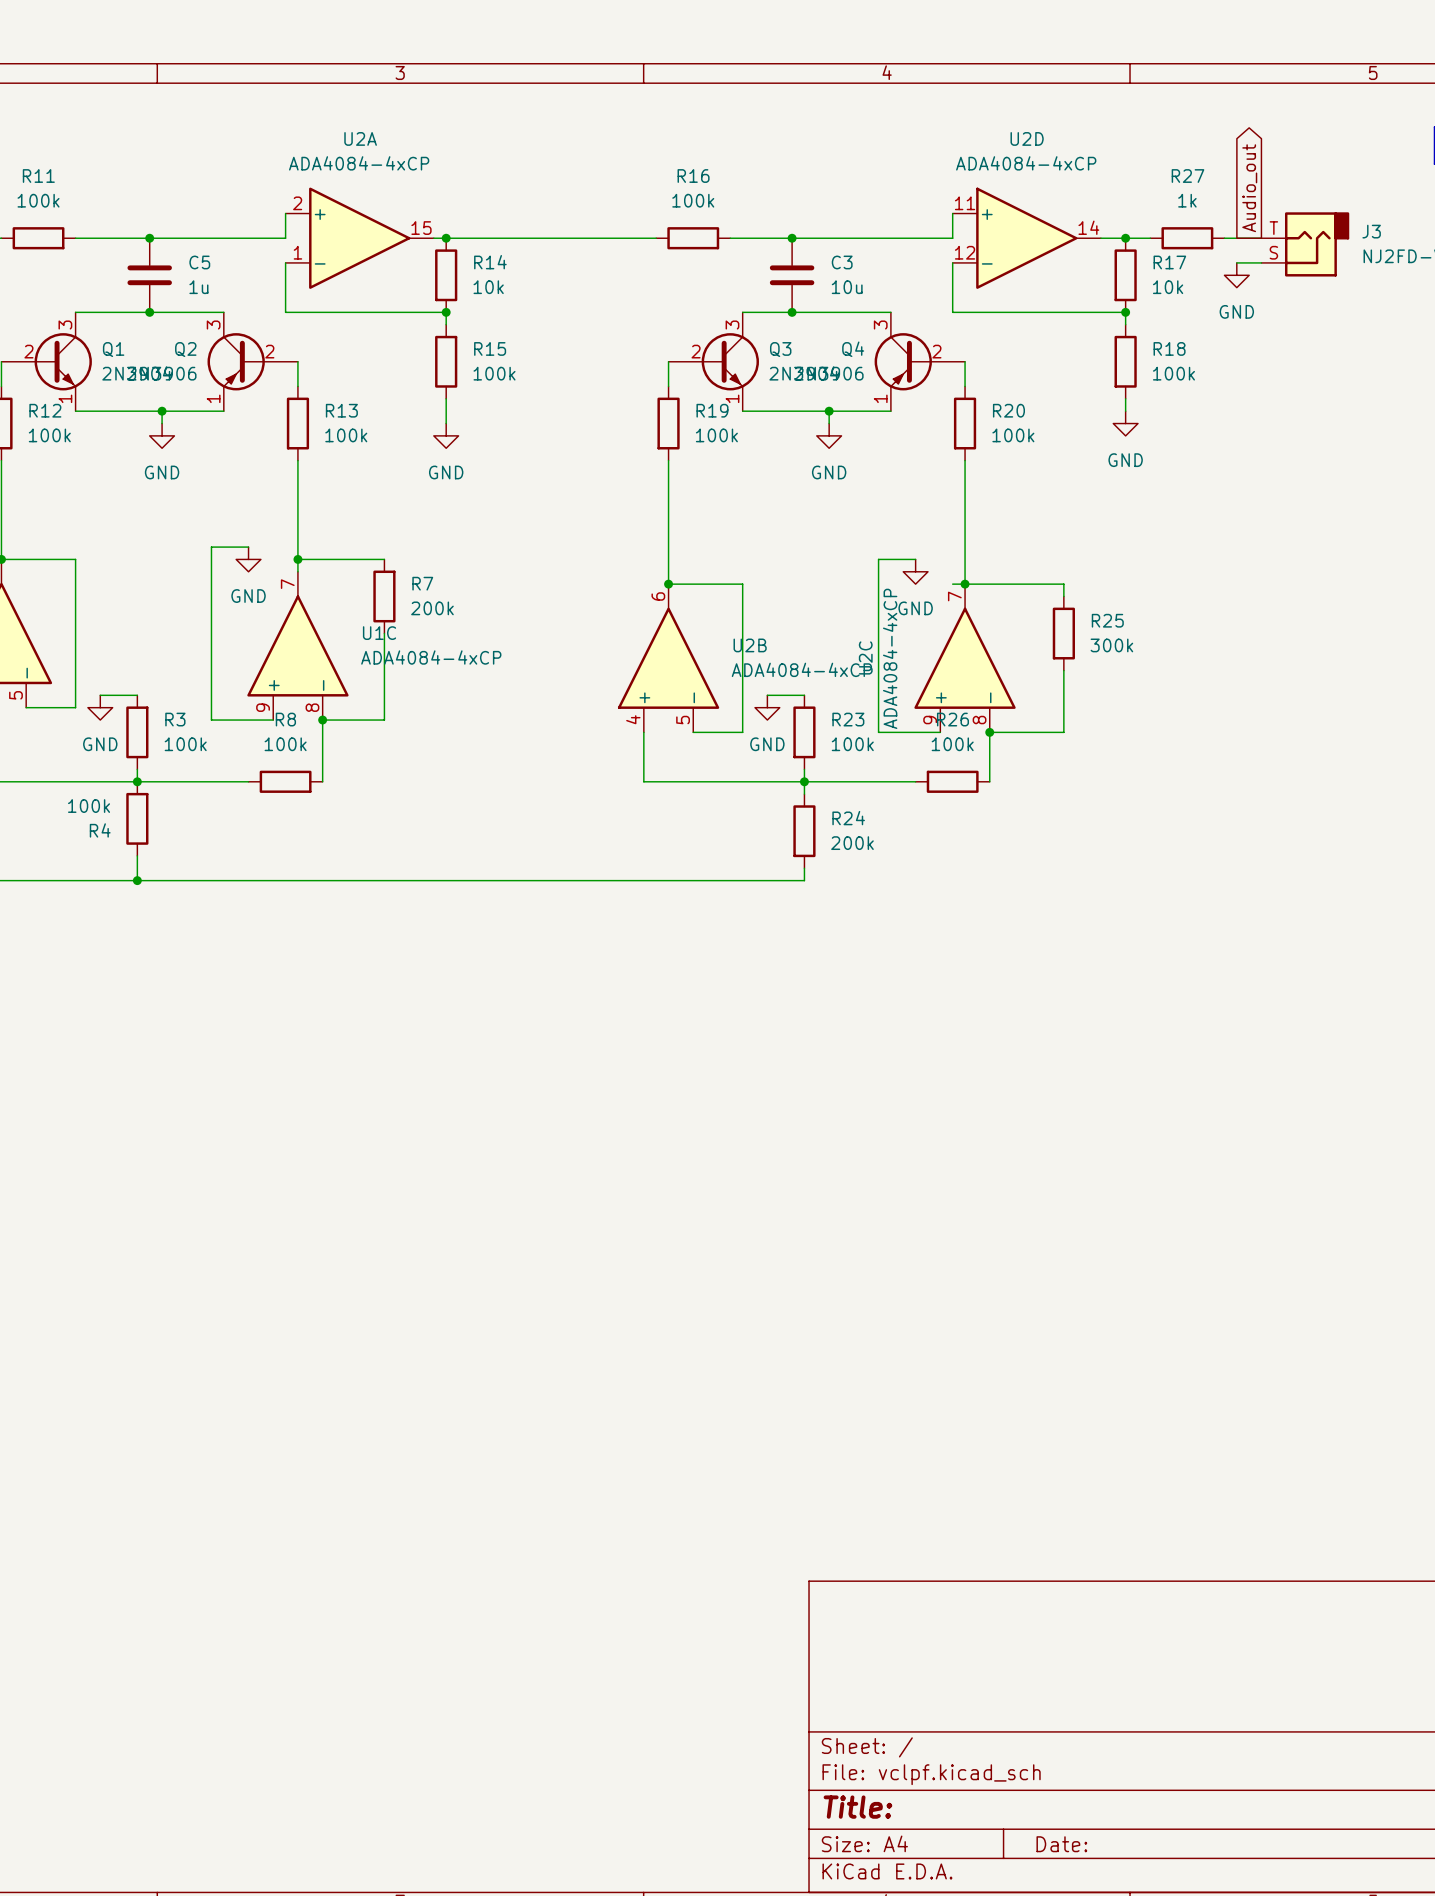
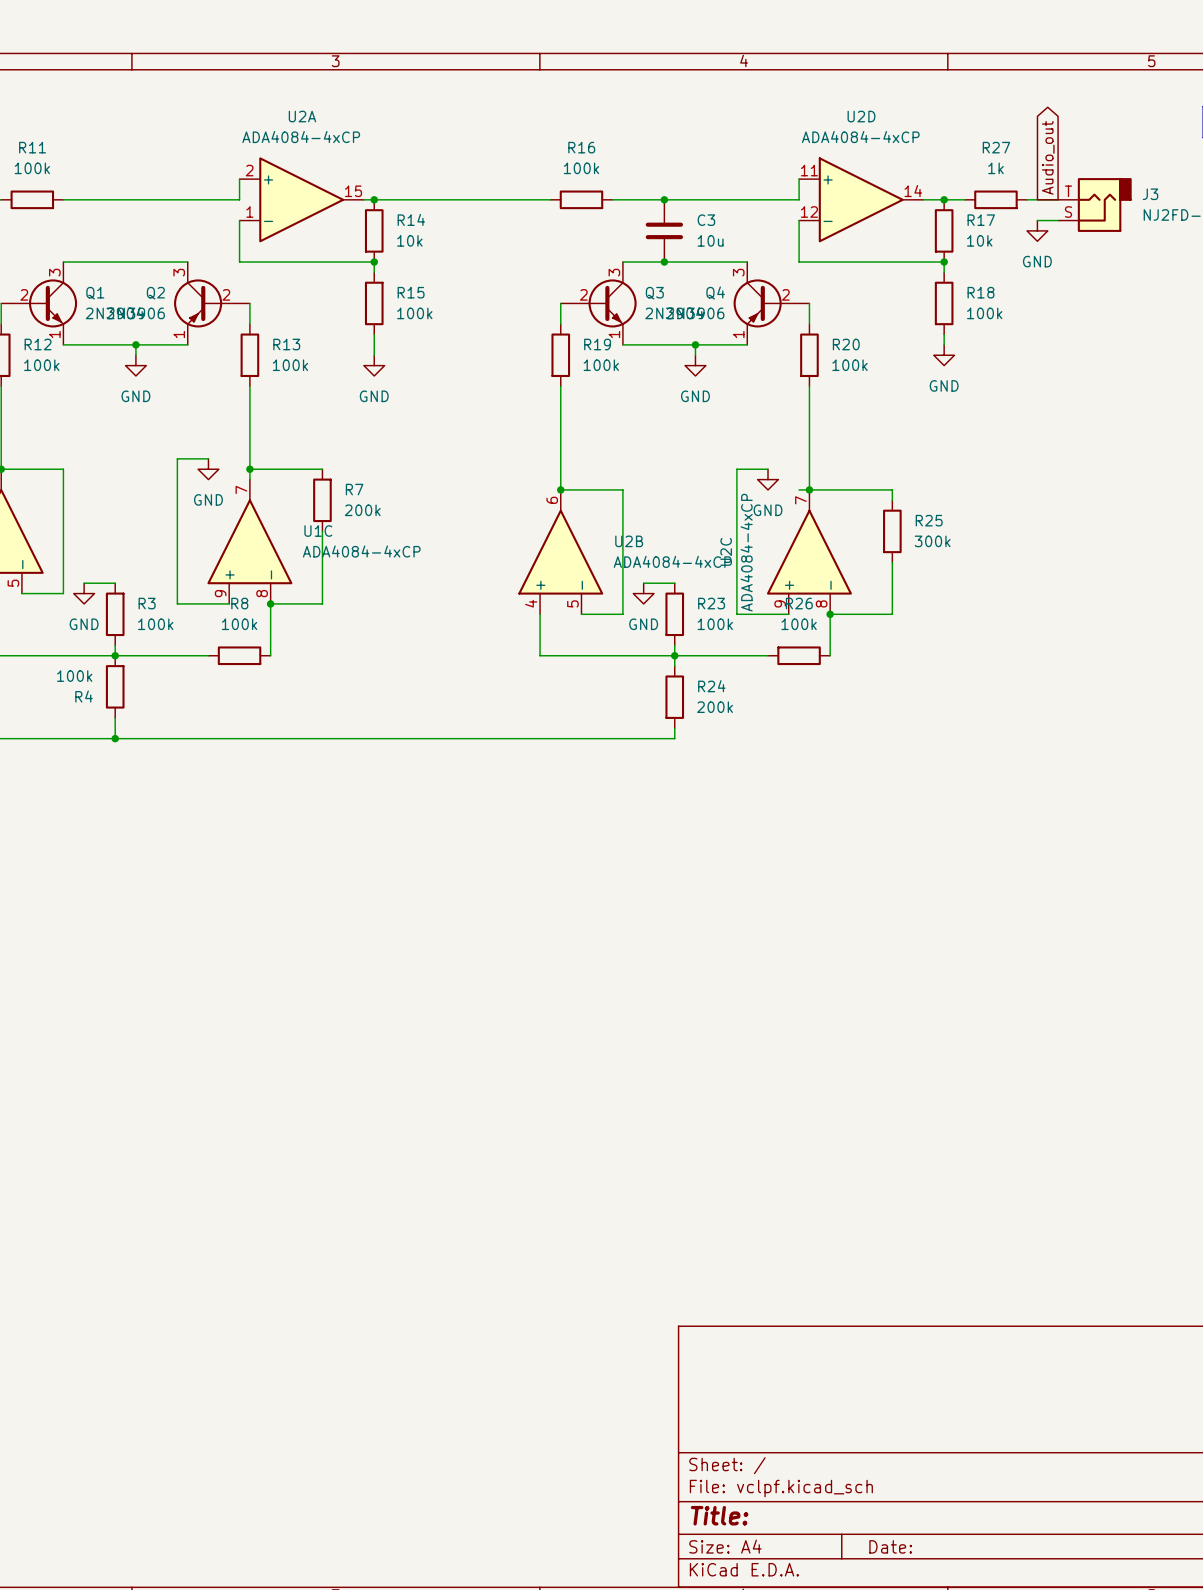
junction: (149, 238) -> none
C5: 1u (149, 275) -> none
junction: (149, 312) -> none

